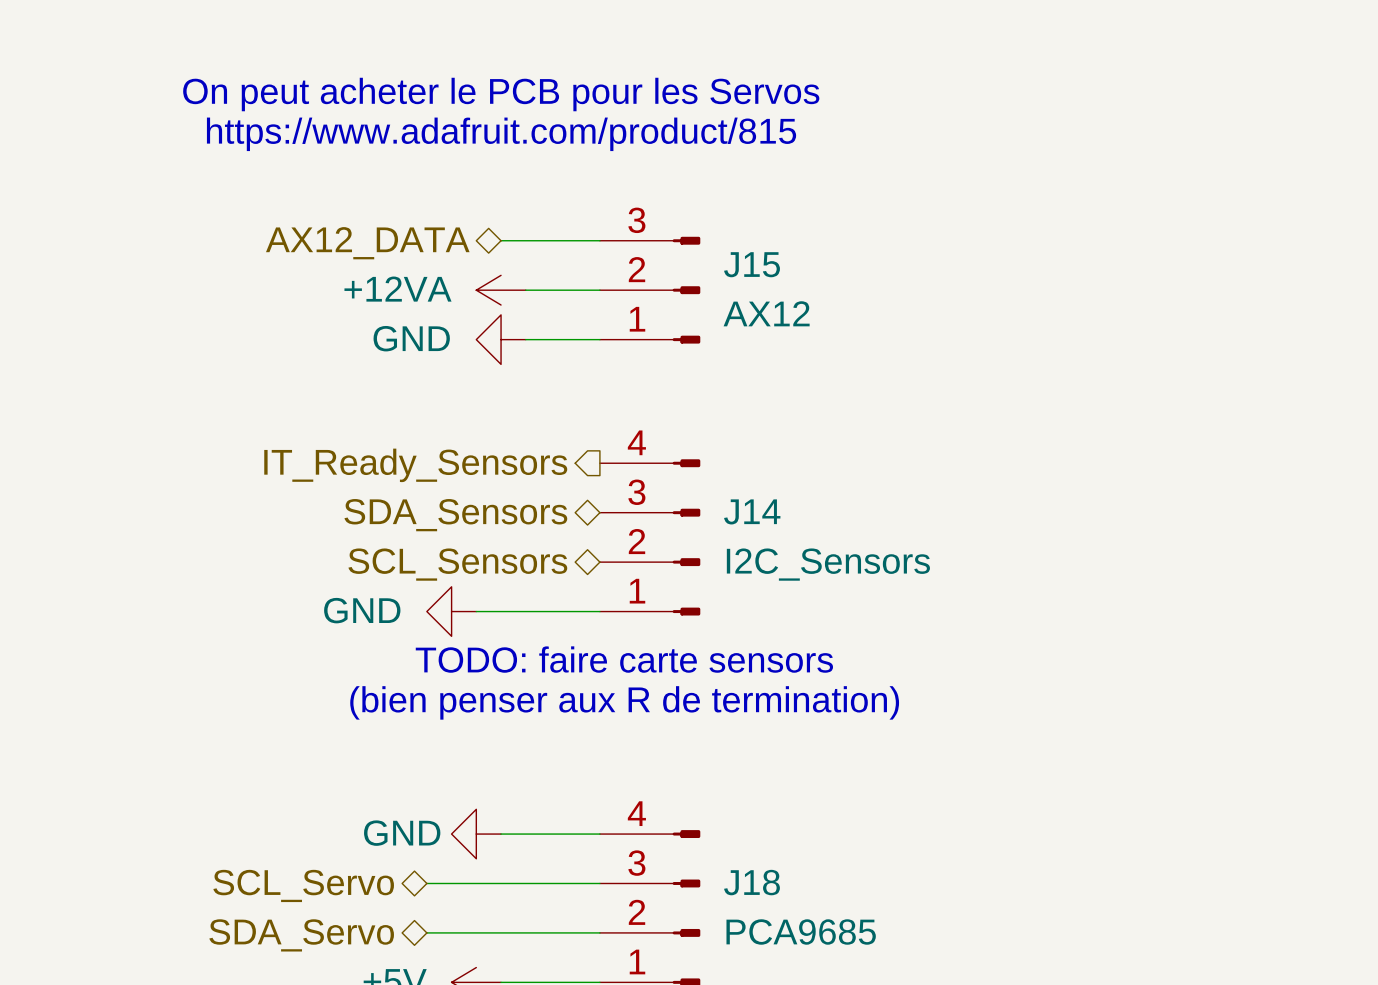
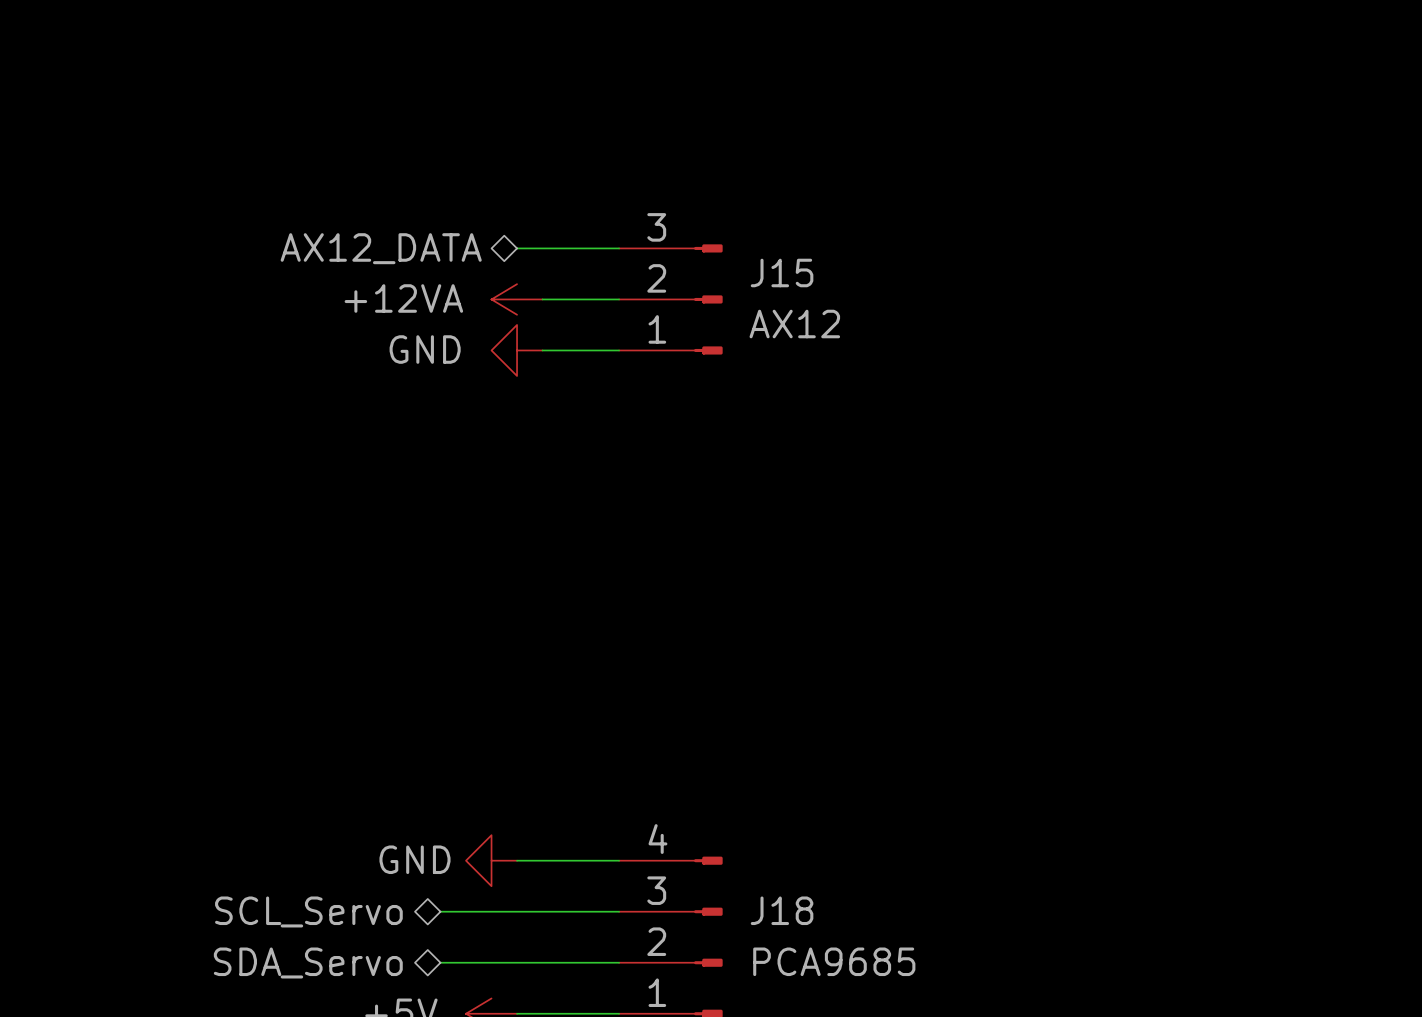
text: On peut acheter le PCB pour les Servos (501, 94) -> none
text: https://www.adafruit.com/product/815 (501, 134) -> none
hierarchical label: IT_Ready_Sensors (415, 465) -> none
hierarchical label: SDA_Sensors (455, 515) -> none
J14: I2C_Sensors (650, 537) -> none
hierarchical label: SCL_Sensors (457, 564) -> none
power symbol: GND (451, 611) -> none
wire: (476, 611) (599, 611) -> none
text: TODO: faire carte sensors (624, 659) -> none
text: (bien penser aux R de termination) (624, 702) -> none

